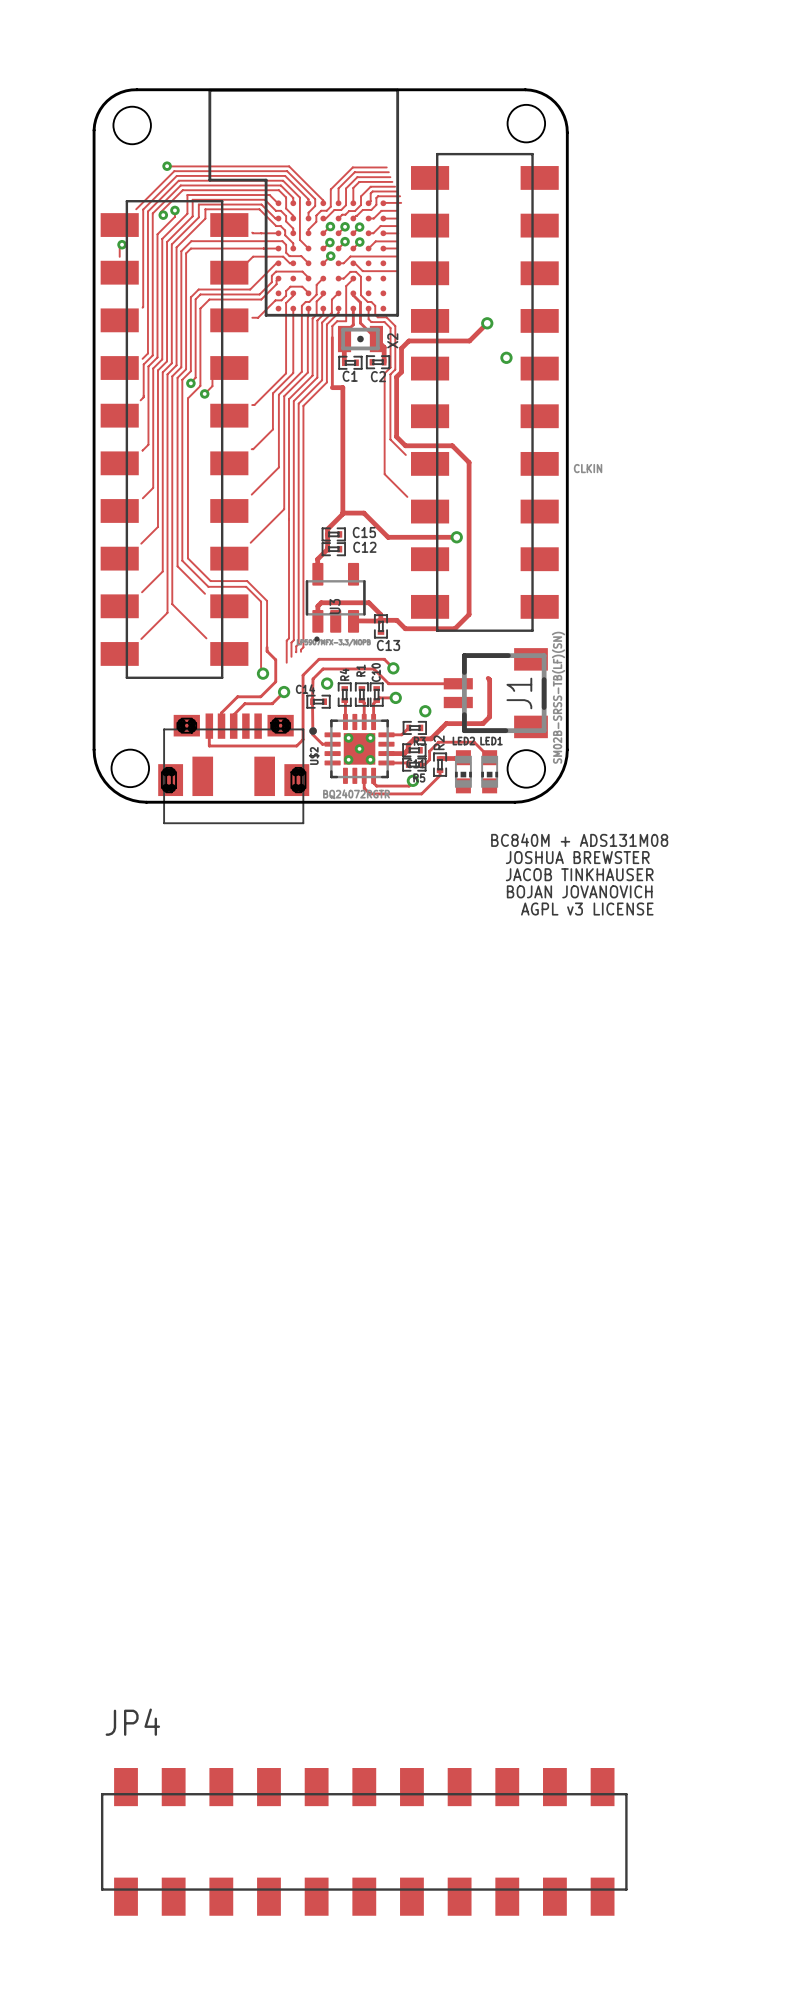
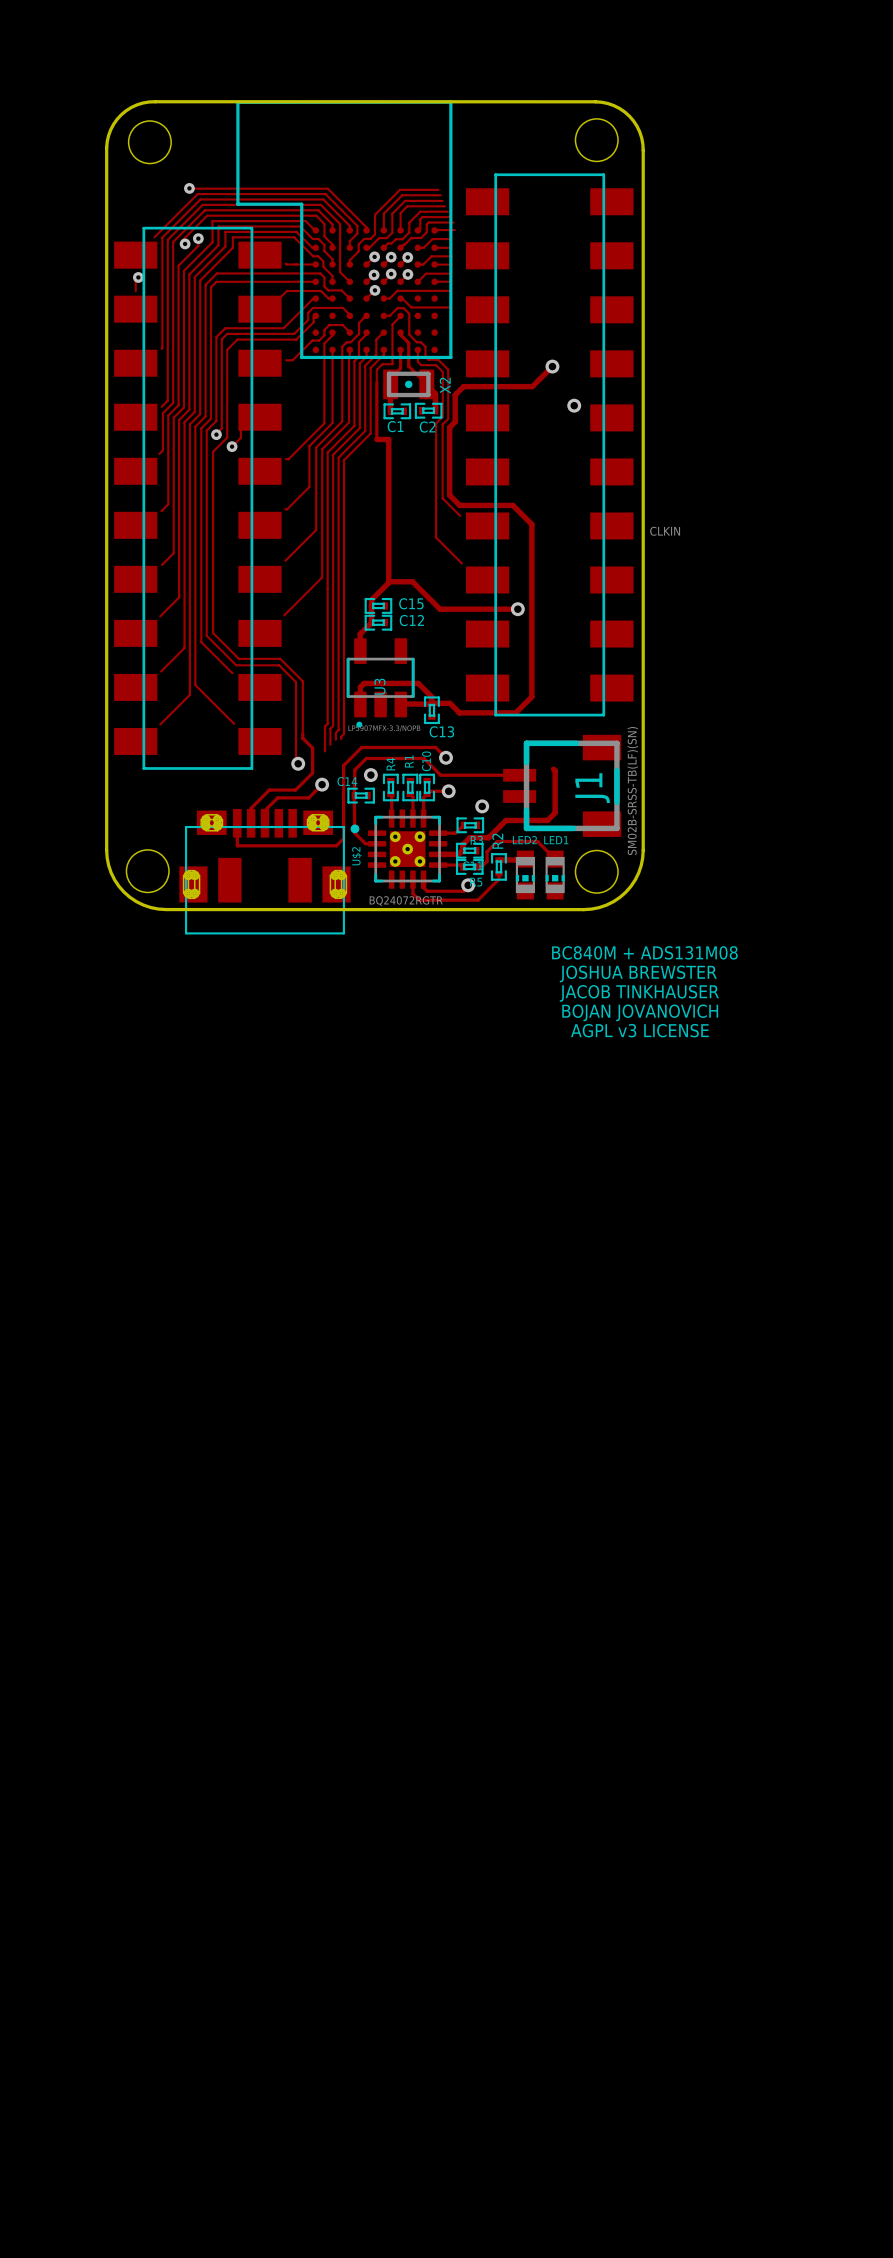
JP4: (364, 1841) -> none

